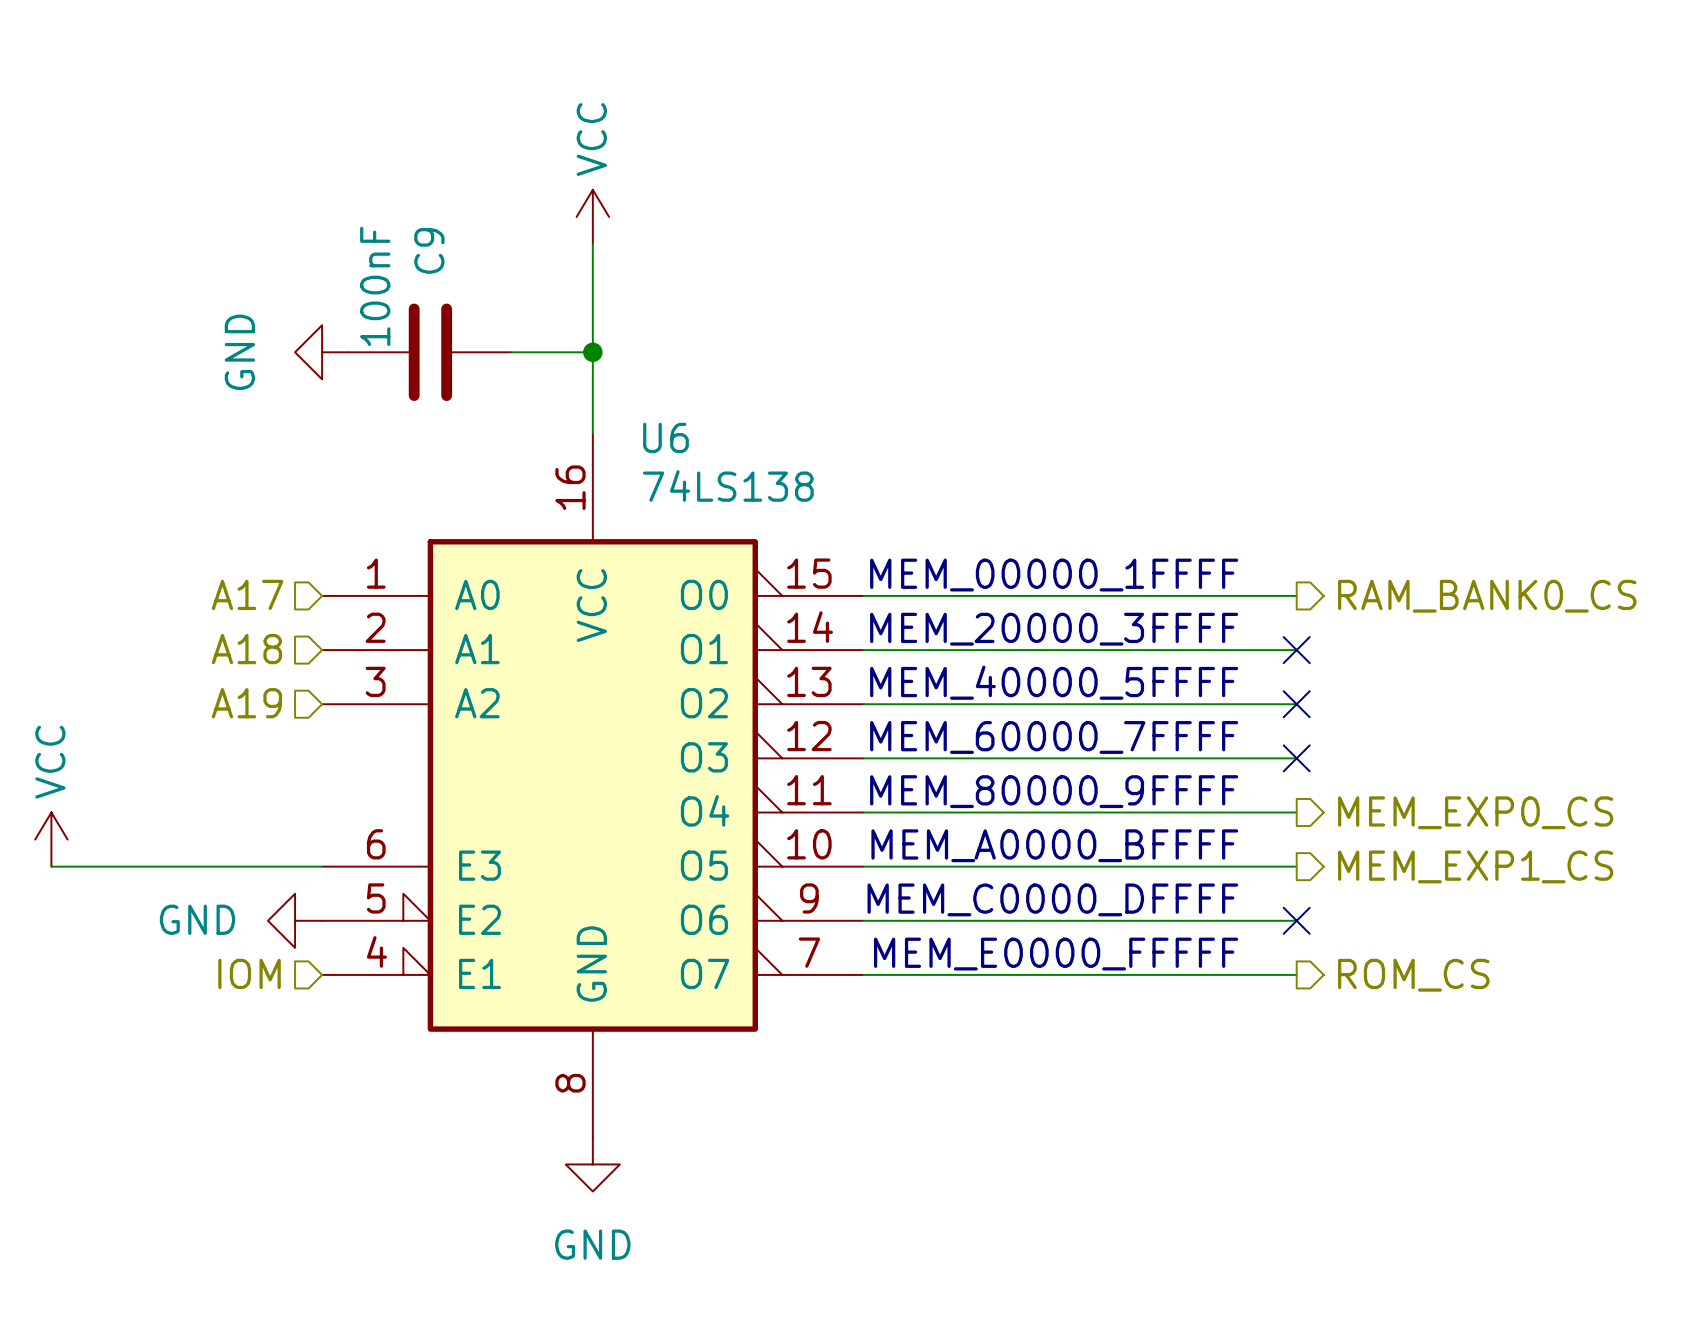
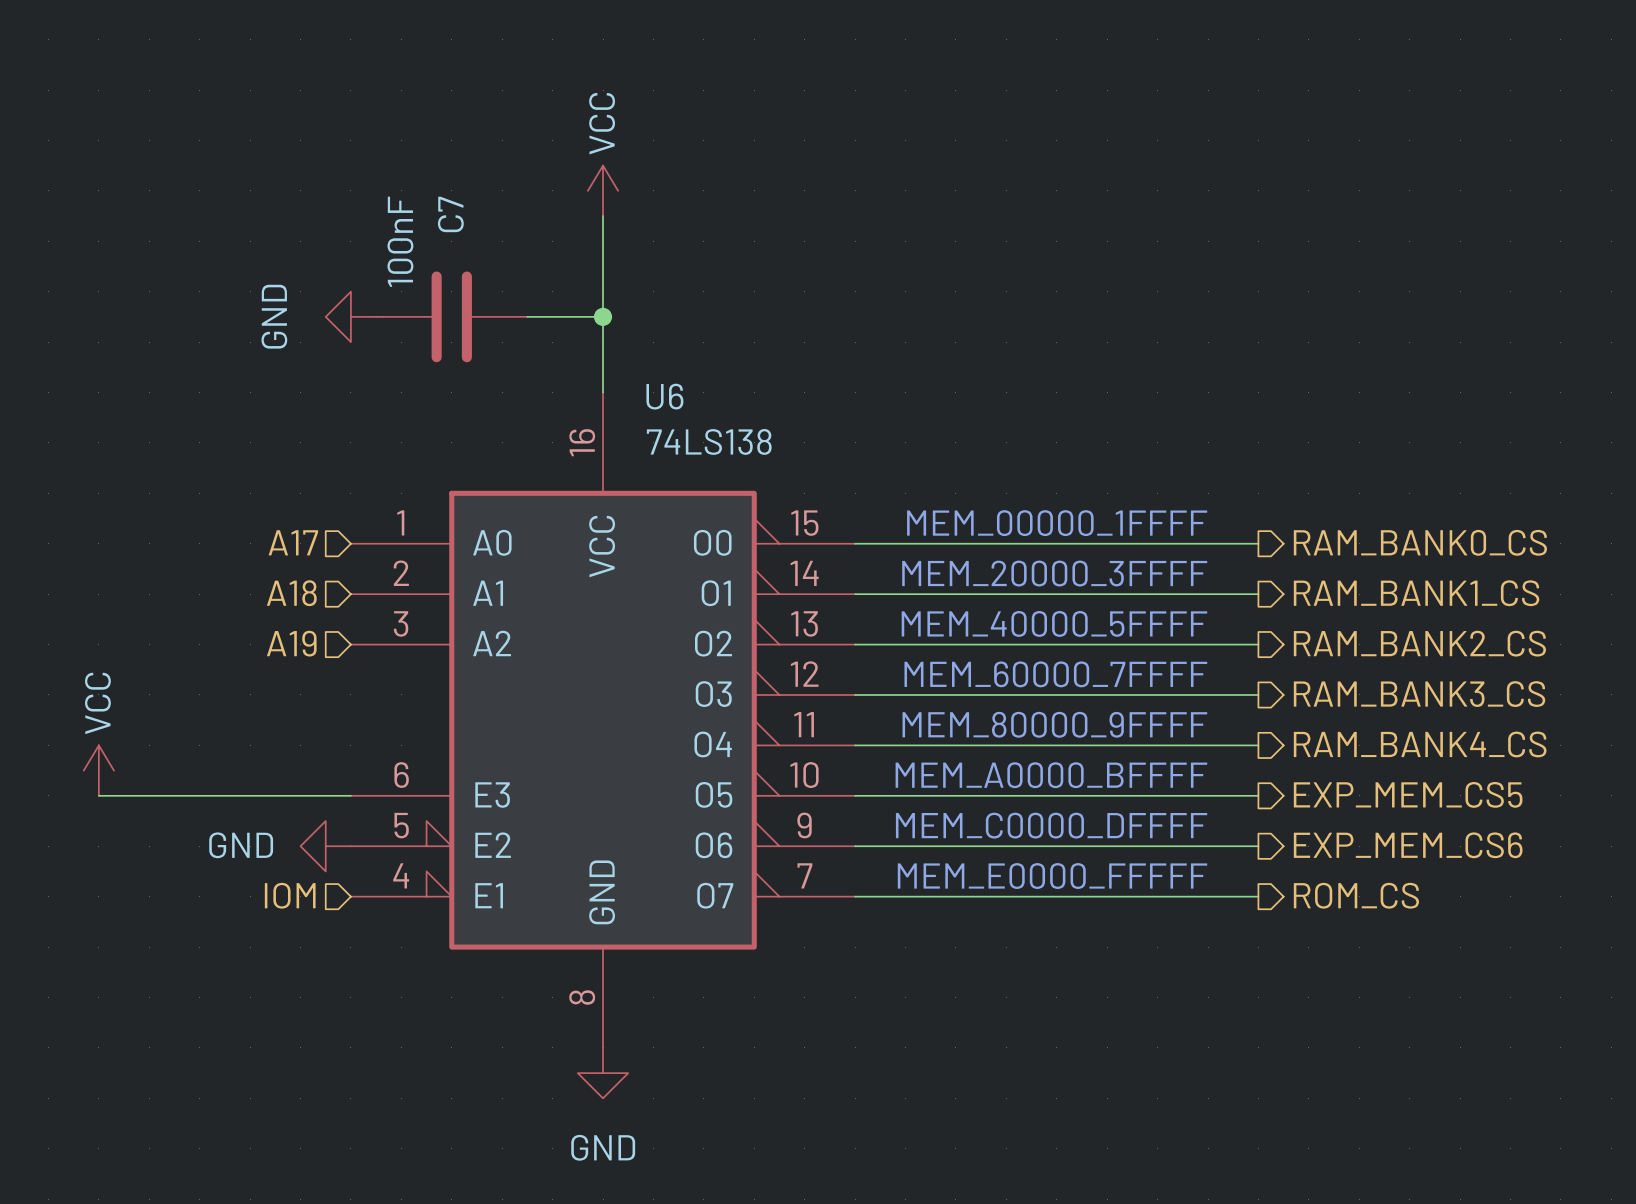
C9 name: C9 (429, 250) -> C7 (450, 214)
no-connect mark: (1296, 650) -> none
hierarchical label: none -> RAM_BANK1_CS (1416, 593)
no-connect mark: (1296, 704) -> none
hierarchical label: none -> RAM_BANK2_CS (1419, 643)
no-connect mark: (1296, 758) -> none
hierarchical label: none -> RAM_BANK3_CS (1419, 694)
hierarchical label: MEM_EXP0_CS (1475, 812) -> RAM_BANK4_CS (1420, 744)
hierarchical label: MEM_EXP1_CS (1475, 866) -> EXP_MEM_CS5 (1408, 794)
no-connect mark: (1296, 920) -> none
hierarchical label: none -> EXP_MEM_CS6 (1408, 845)

